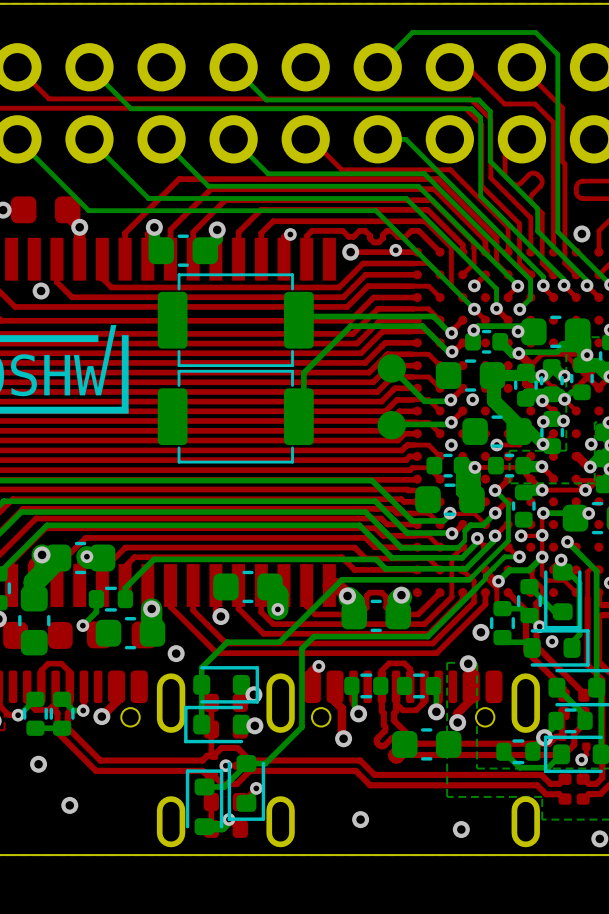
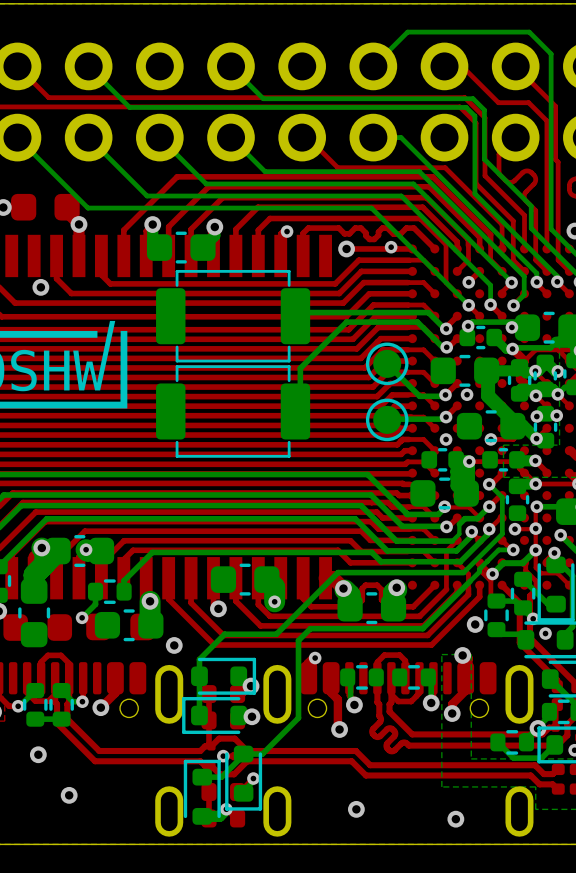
part footprint: [377, 354, 407, 383] -> [365, 342, 409, 386]
part footprint: [377, 411, 407, 440] -> [365, 398, 409, 442]
part: (426, 744) -> none

